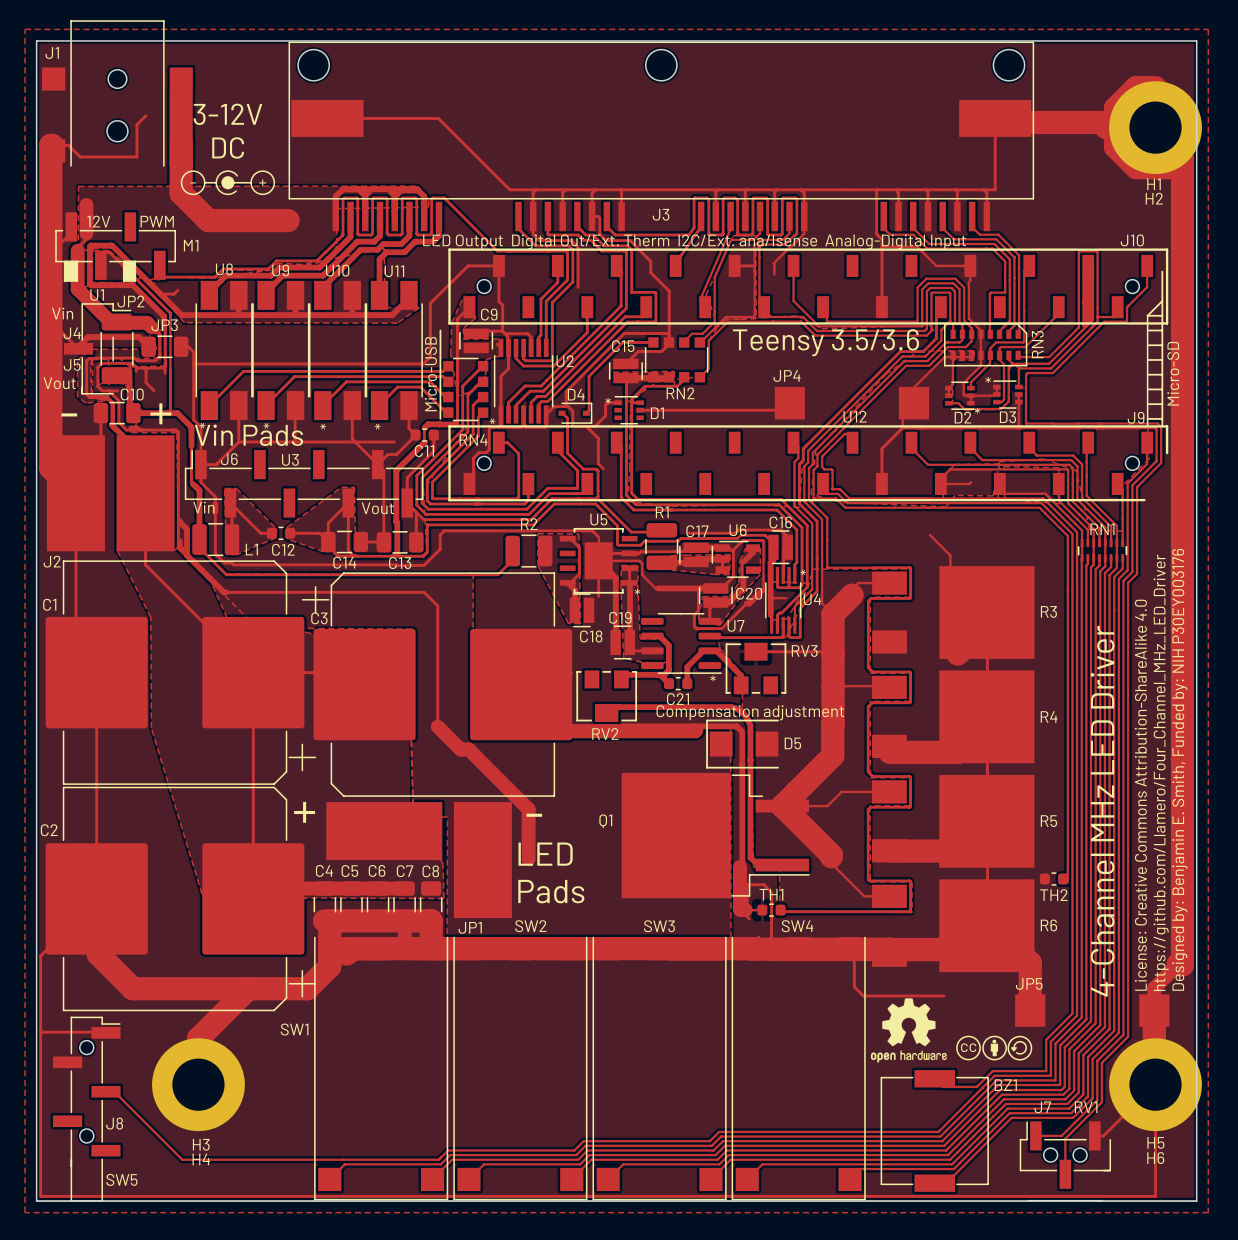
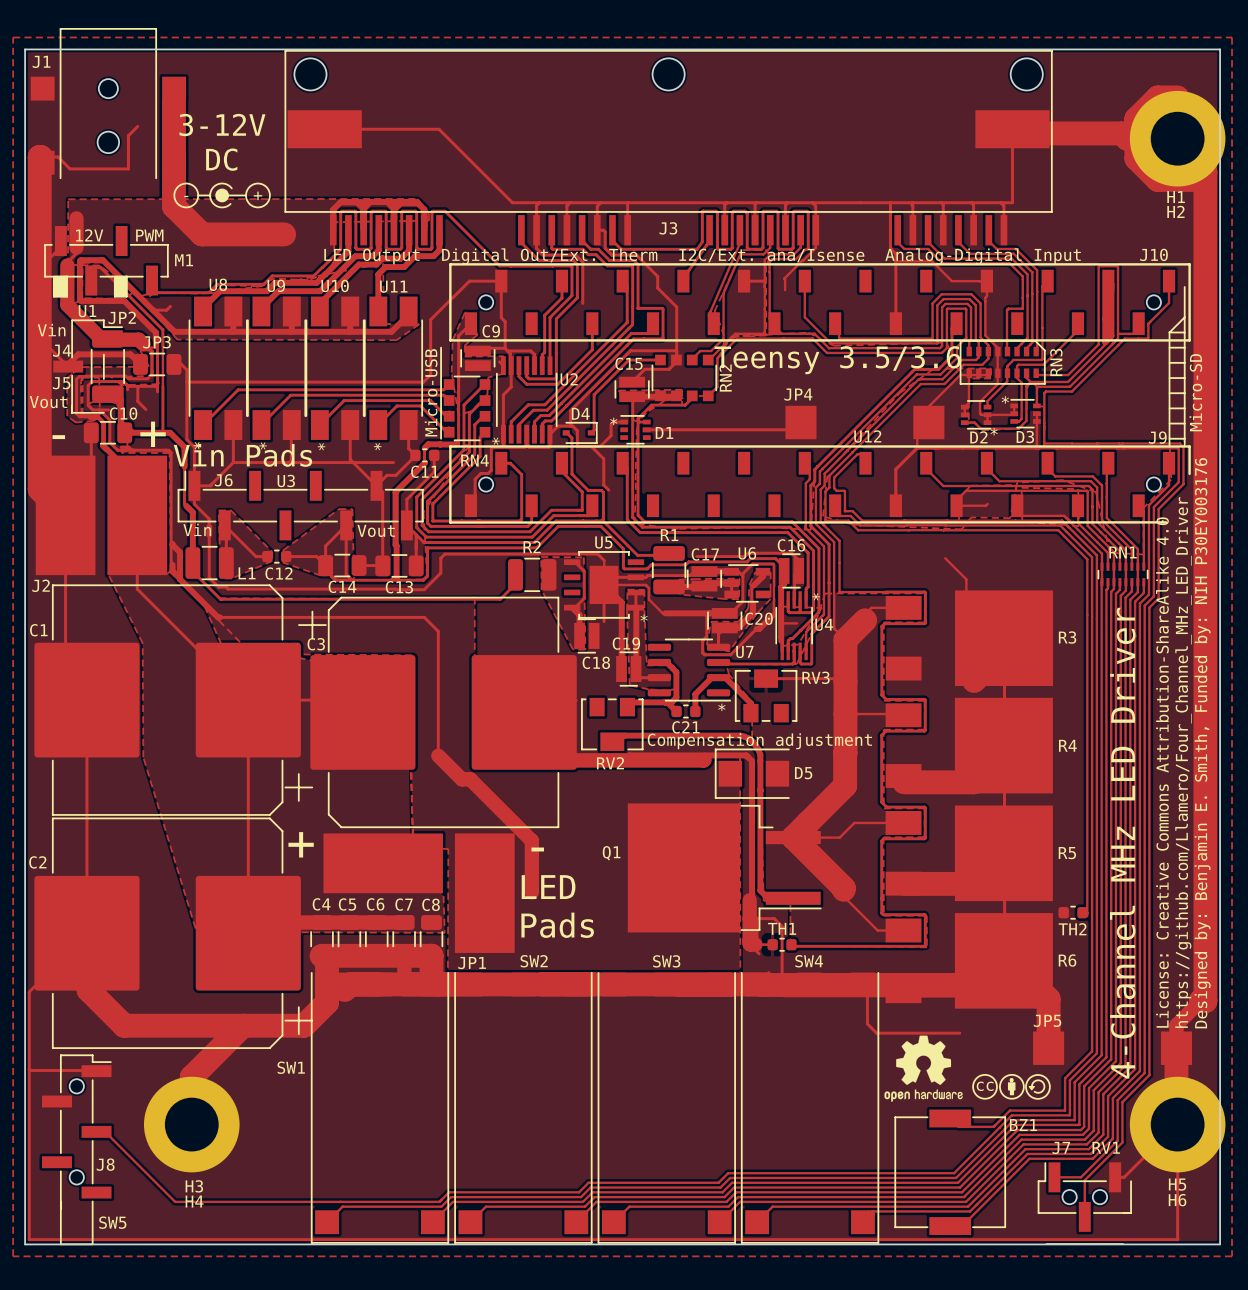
RN2 name rotation: 0° (680, 393) -> 90° counterclockwise (725, 378)
RN2 name position: RN2 (680, 393) -> RN2 (725, 378)

